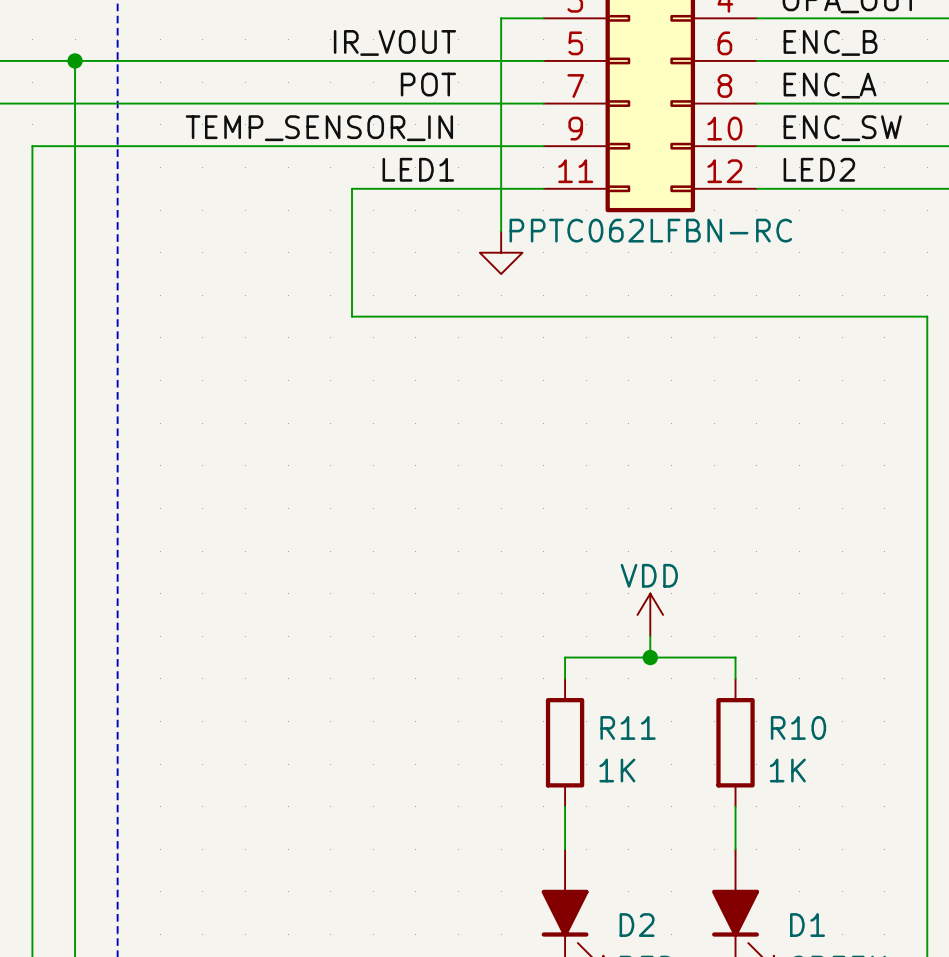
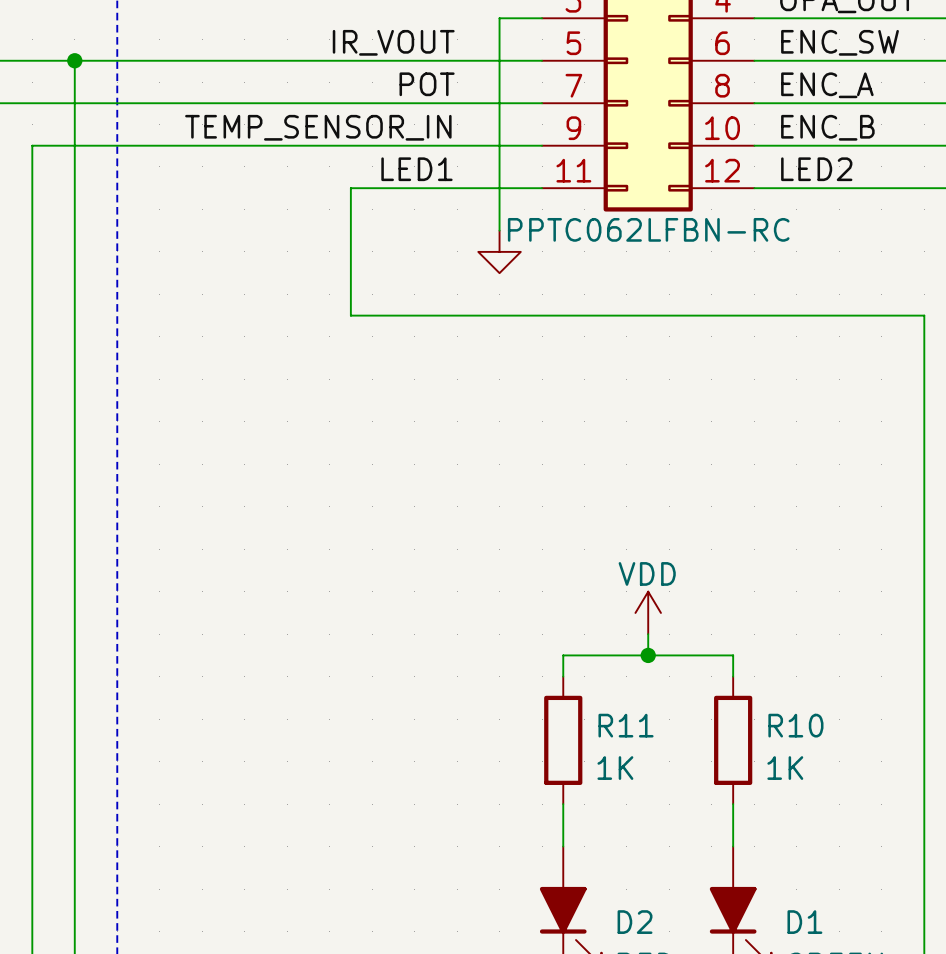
label: ENC_B (830, 42) -> ENC_SW (840, 42)
label: ENC_SW (842, 128) -> ENC_B (827, 127)

